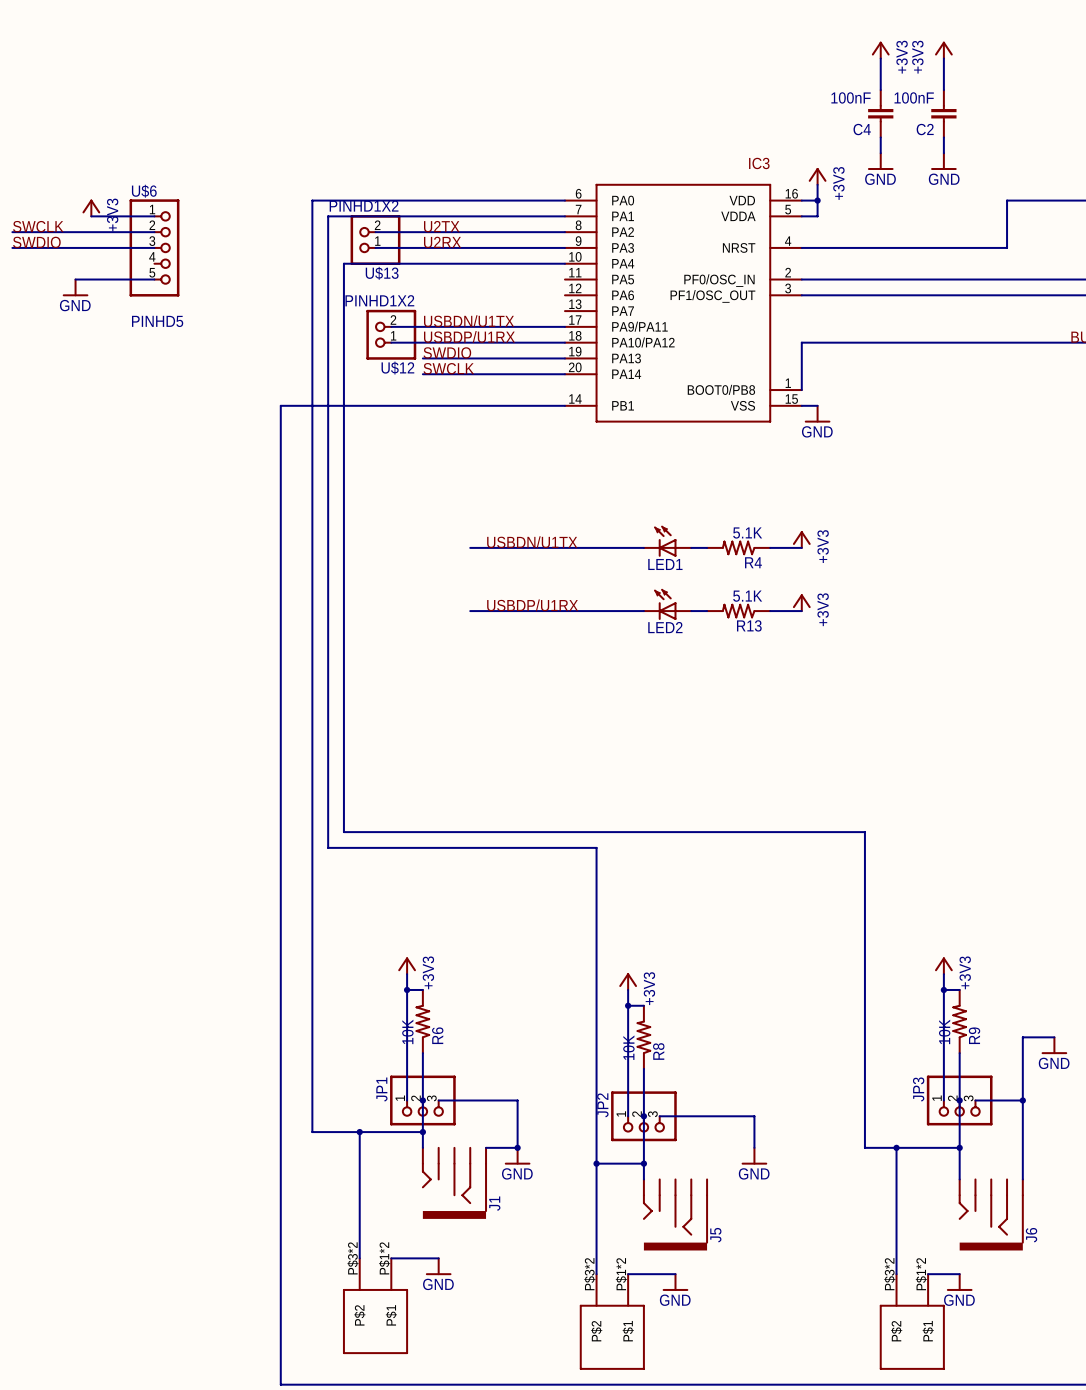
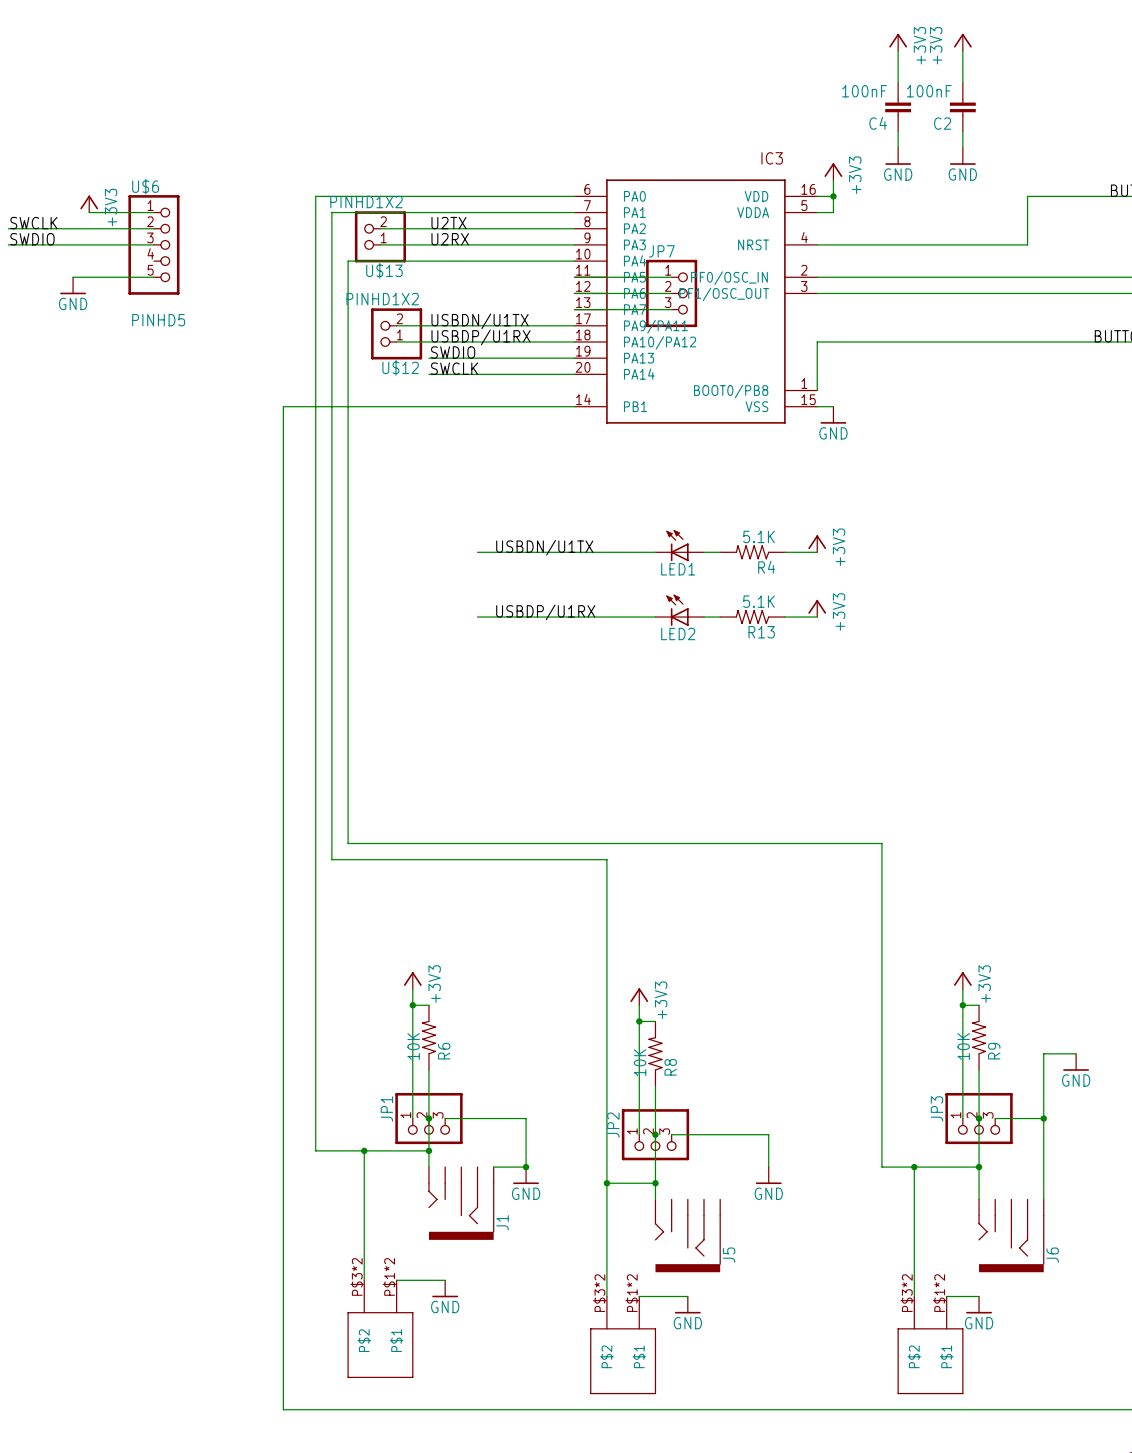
wire: none -> (574, 277) (671, 277)
wire: none -> (574, 293) (671, 293)
JP7: none -> (671, 293)
wire: none -> (574, 309) (671, 309)

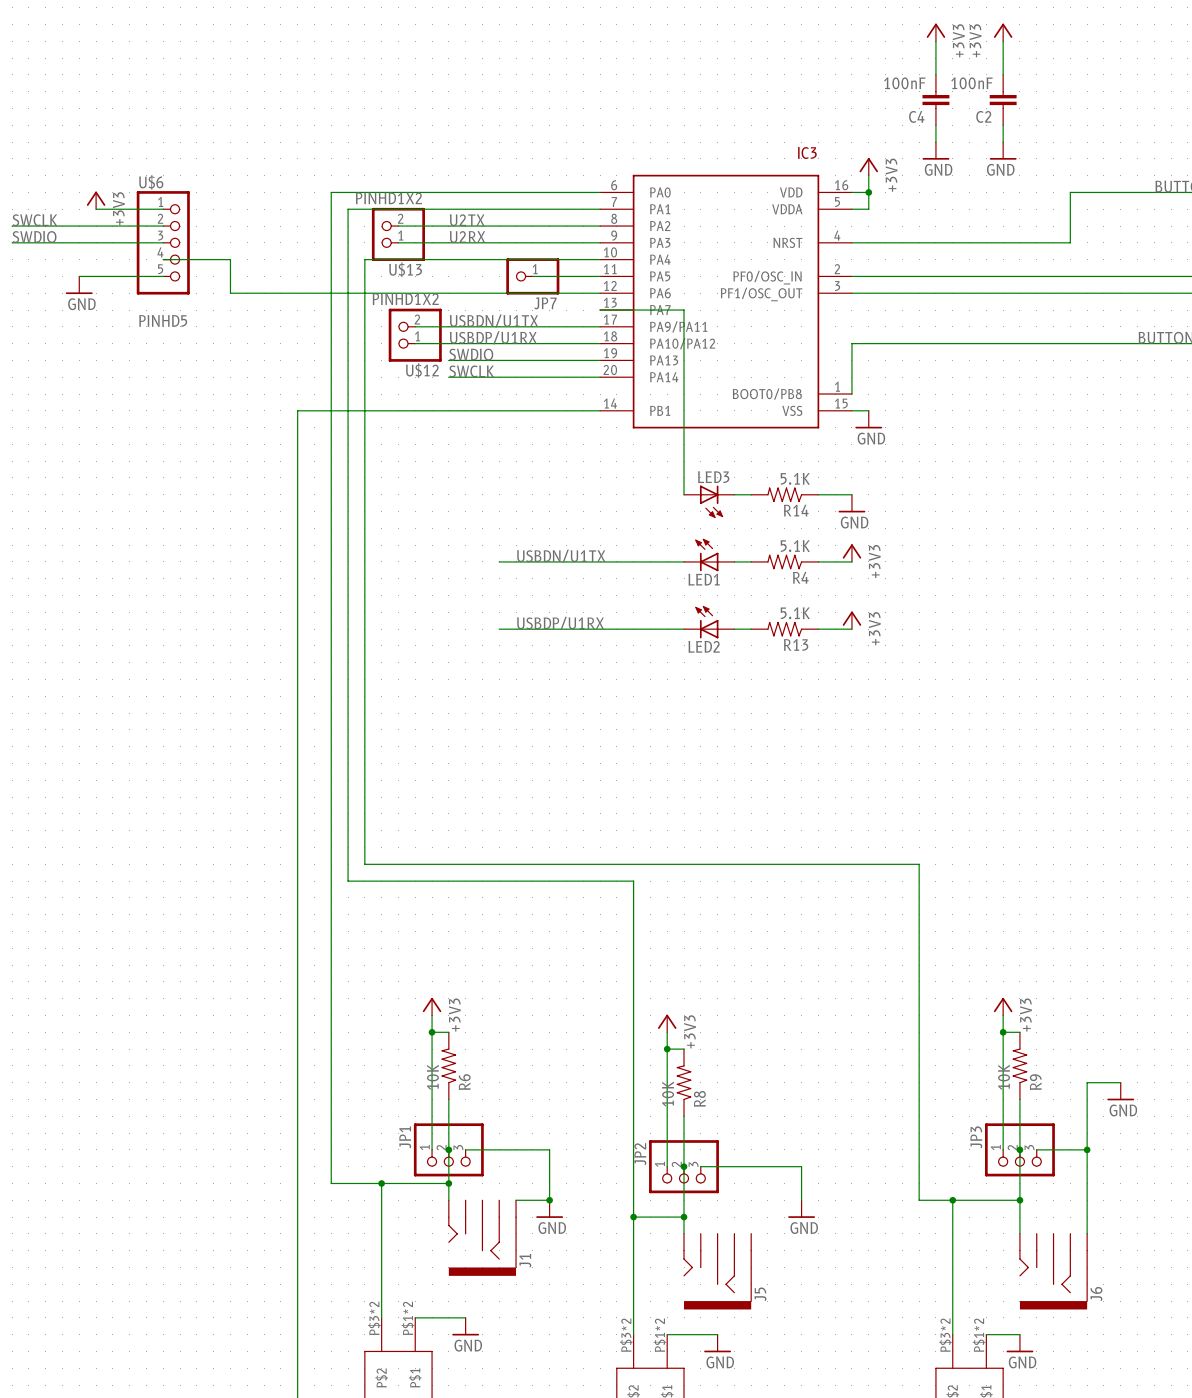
JP7 name position: JP7 (661, 251) -> JP7 (545, 303)
JP7 symbol: [646, 259, 698, 328] -> [506, 258, 560, 295]
wire: (574, 277) (671, 277) -> (600, 276) (532, 276)
wire: (574, 293) (671, 293) -> (600, 293) (230, 293) (230, 259) (163, 259)
wire: (655, 309) (671, 309) -> (684, 310) (684, 494)
wire: none -> (734, 494) (751, 494)
R14: none -> 5.1K (784, 494)
wire: none -> (818, 494) (851, 494)
LED3: none -> (709, 501)
power symbol: none -> GND (851, 503)

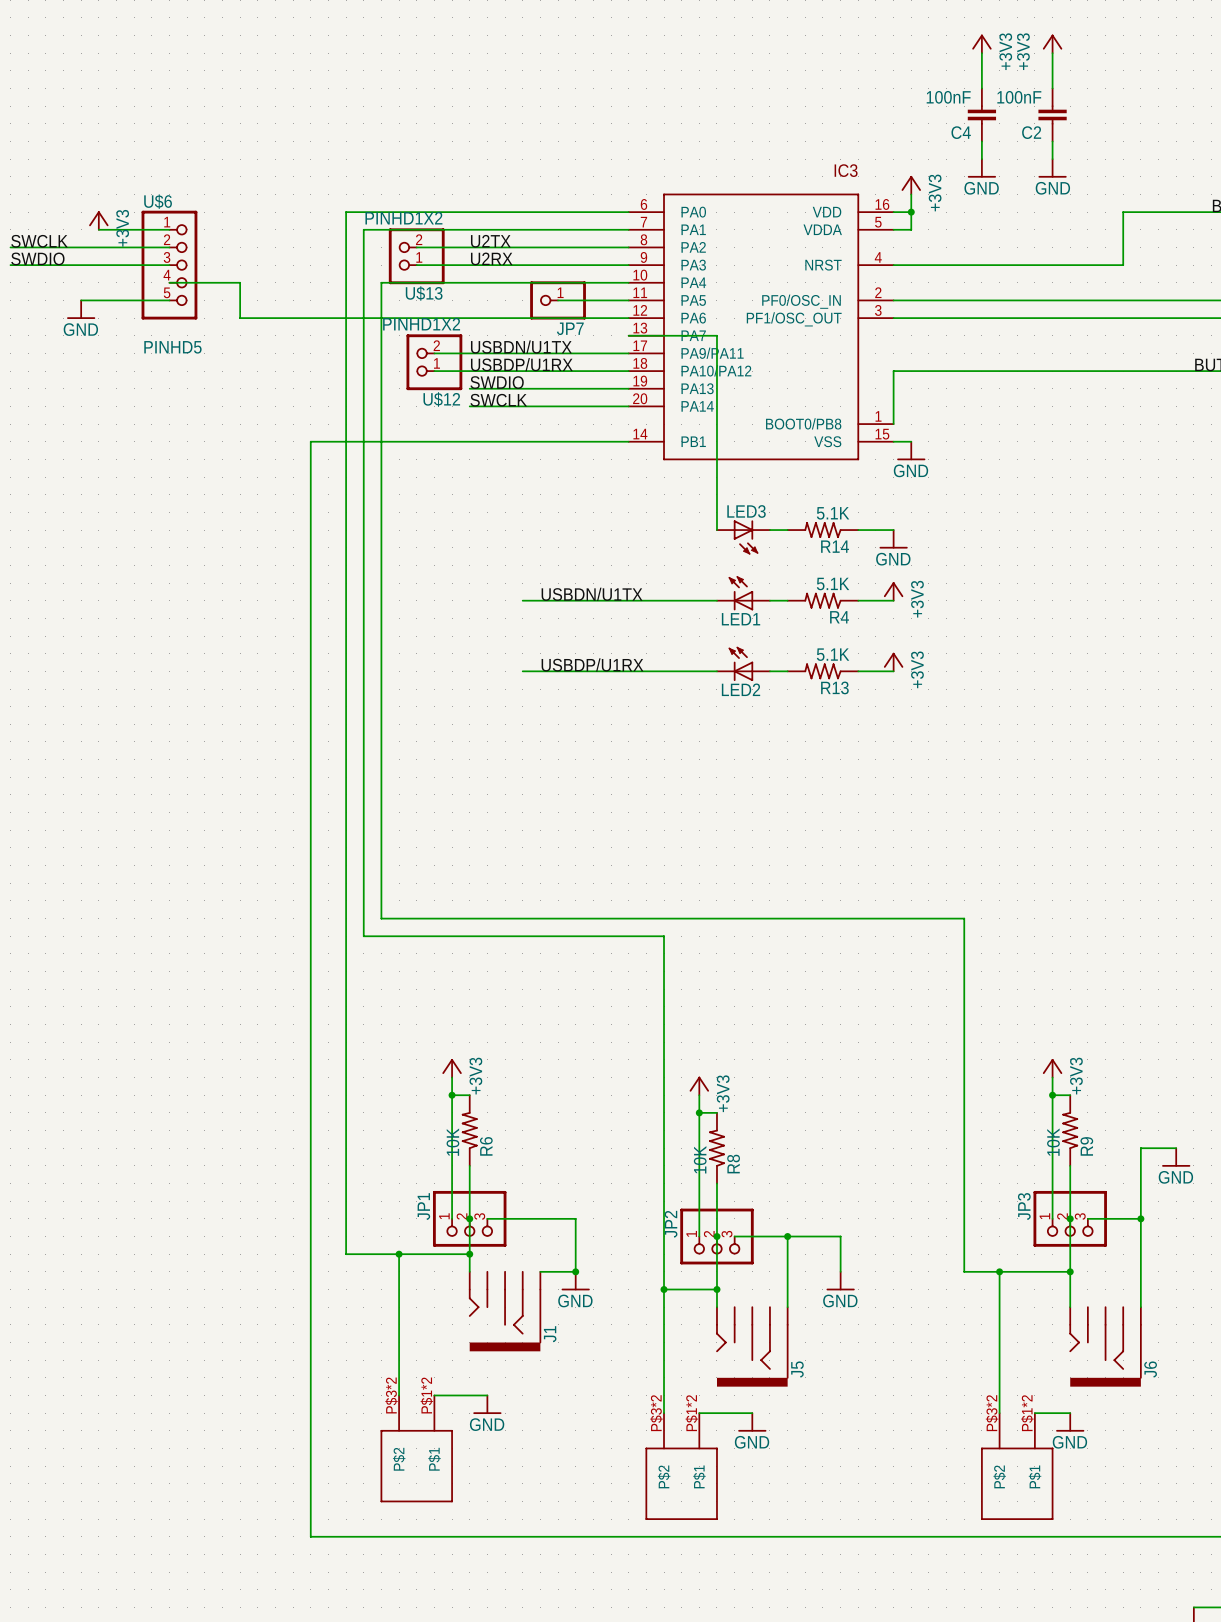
wire: none -> (787, 1236) (787, 1307)
junction: none -> (787, 1236)

